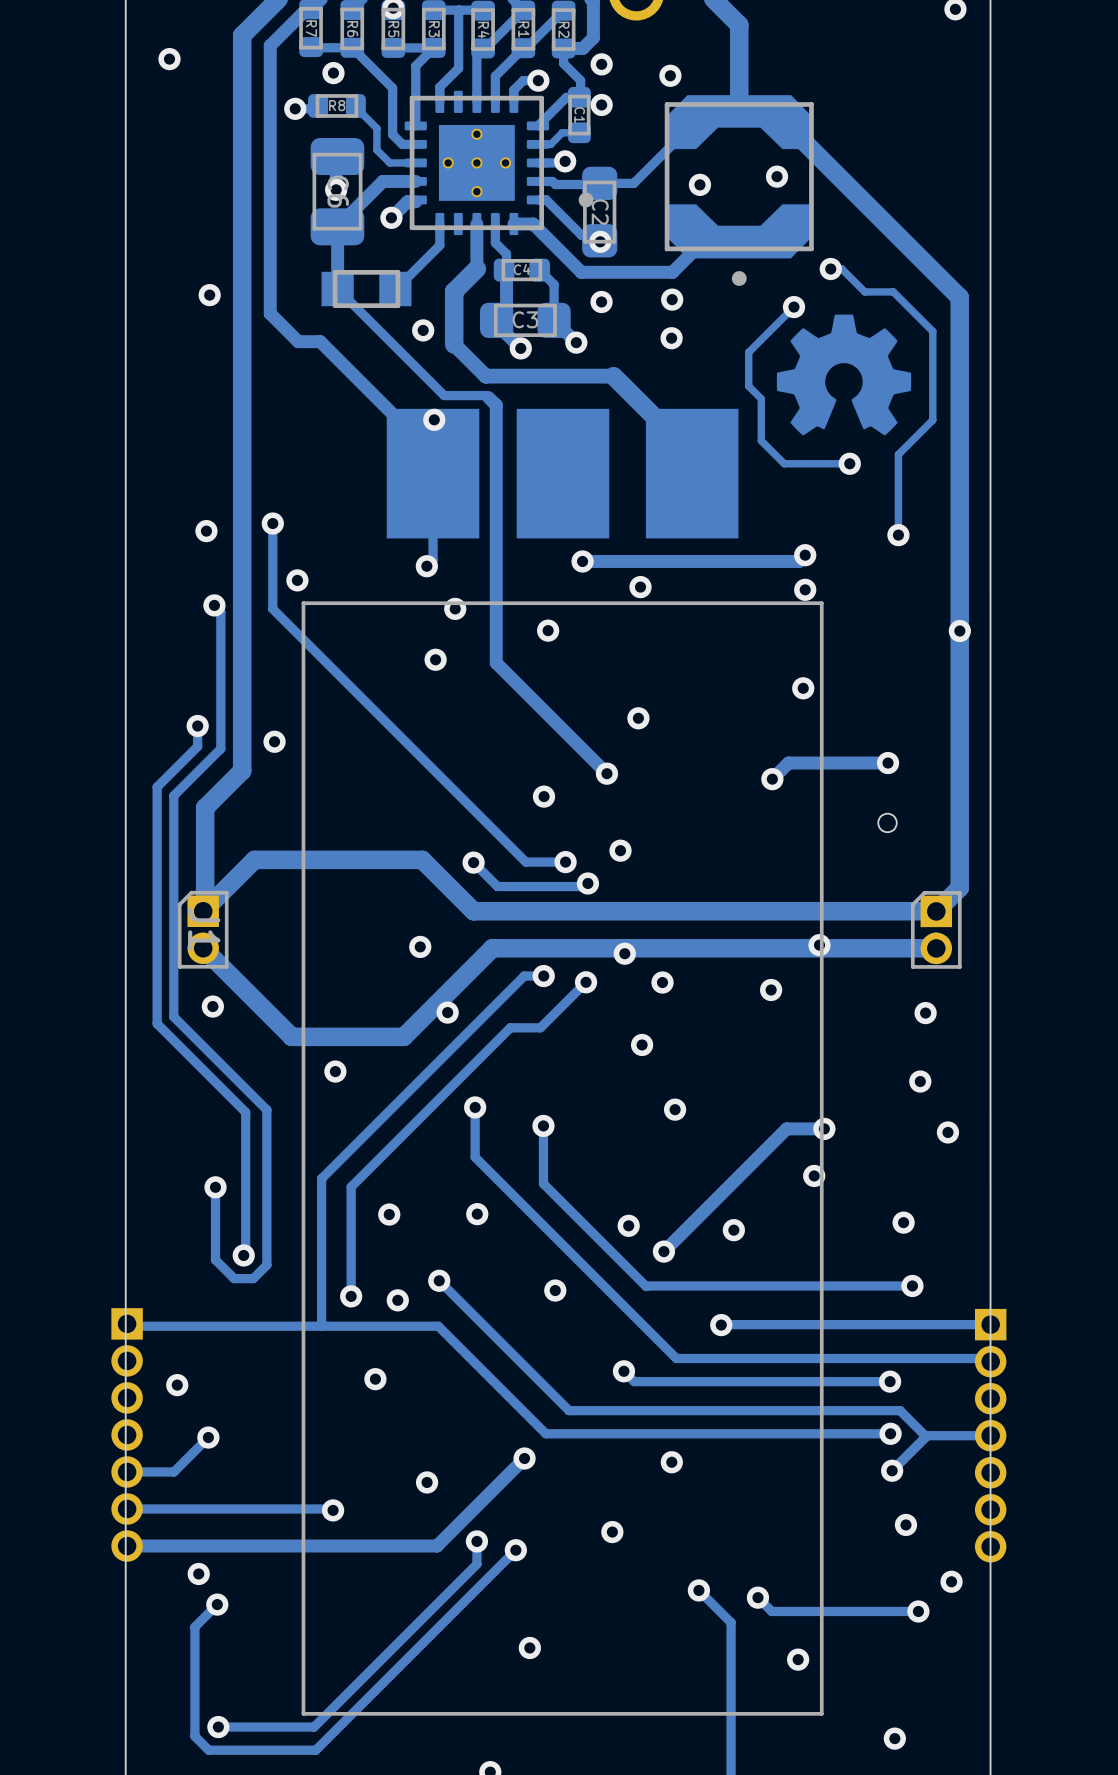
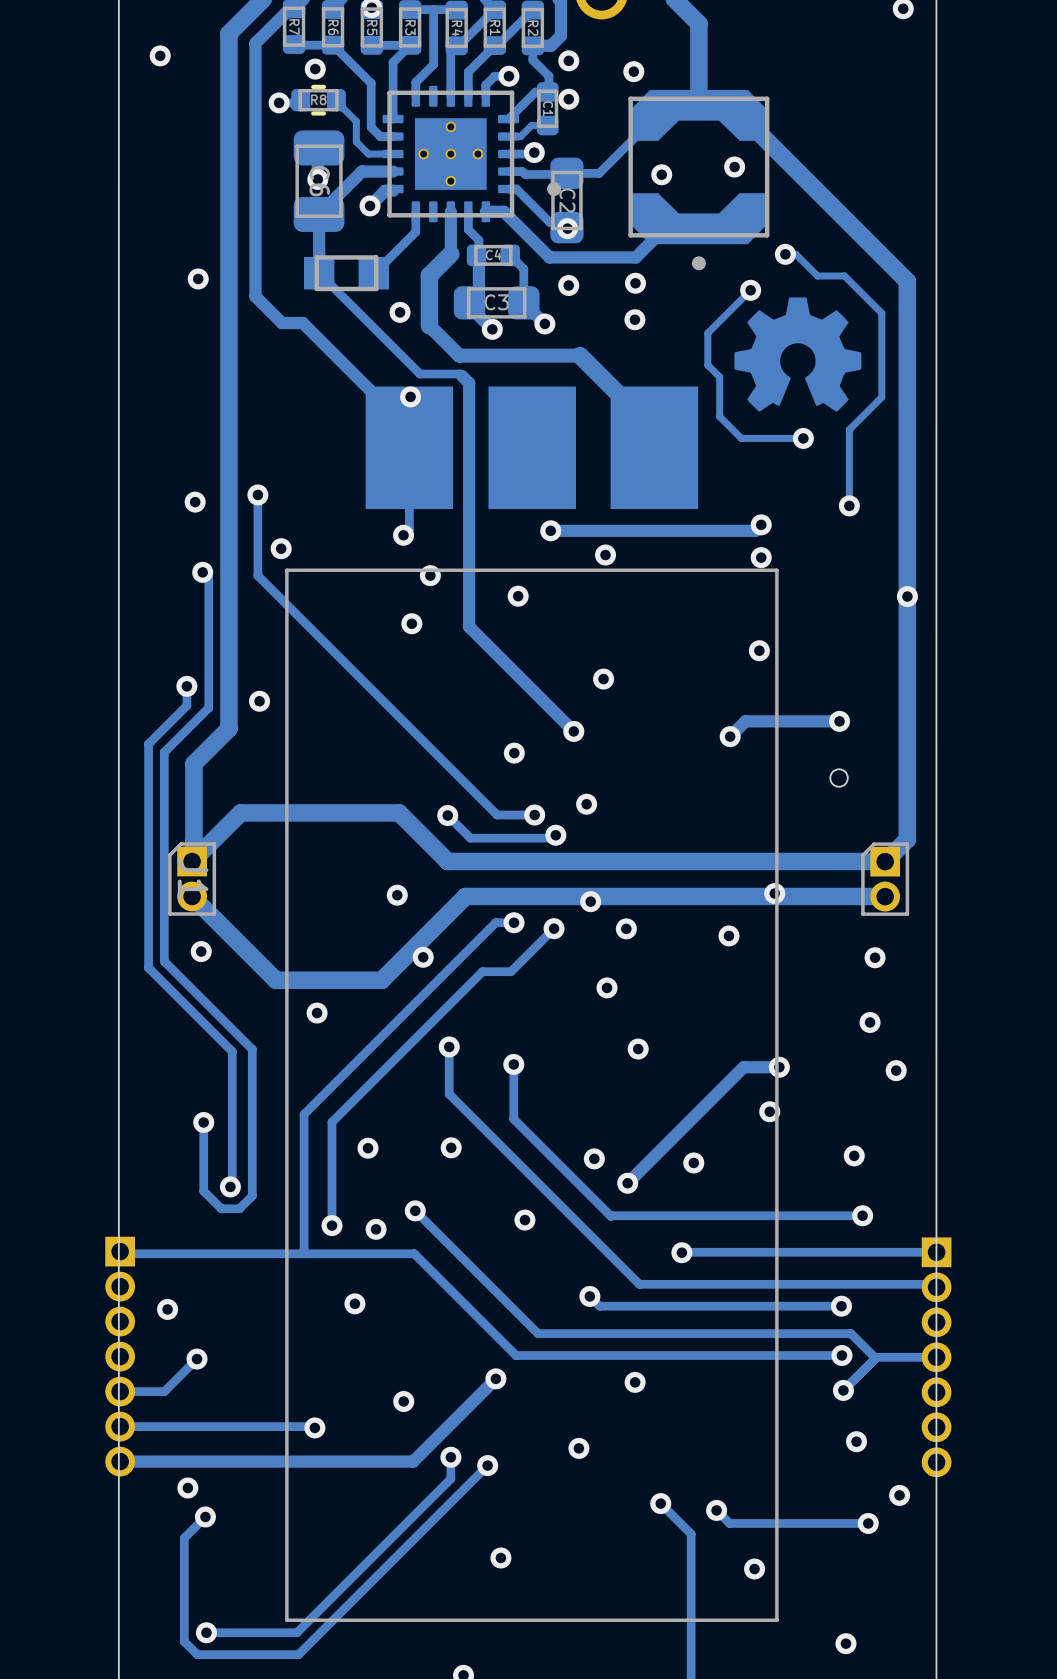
R8 footprint: [308, 94, 366, 118] -> [291, 84, 346, 116]

